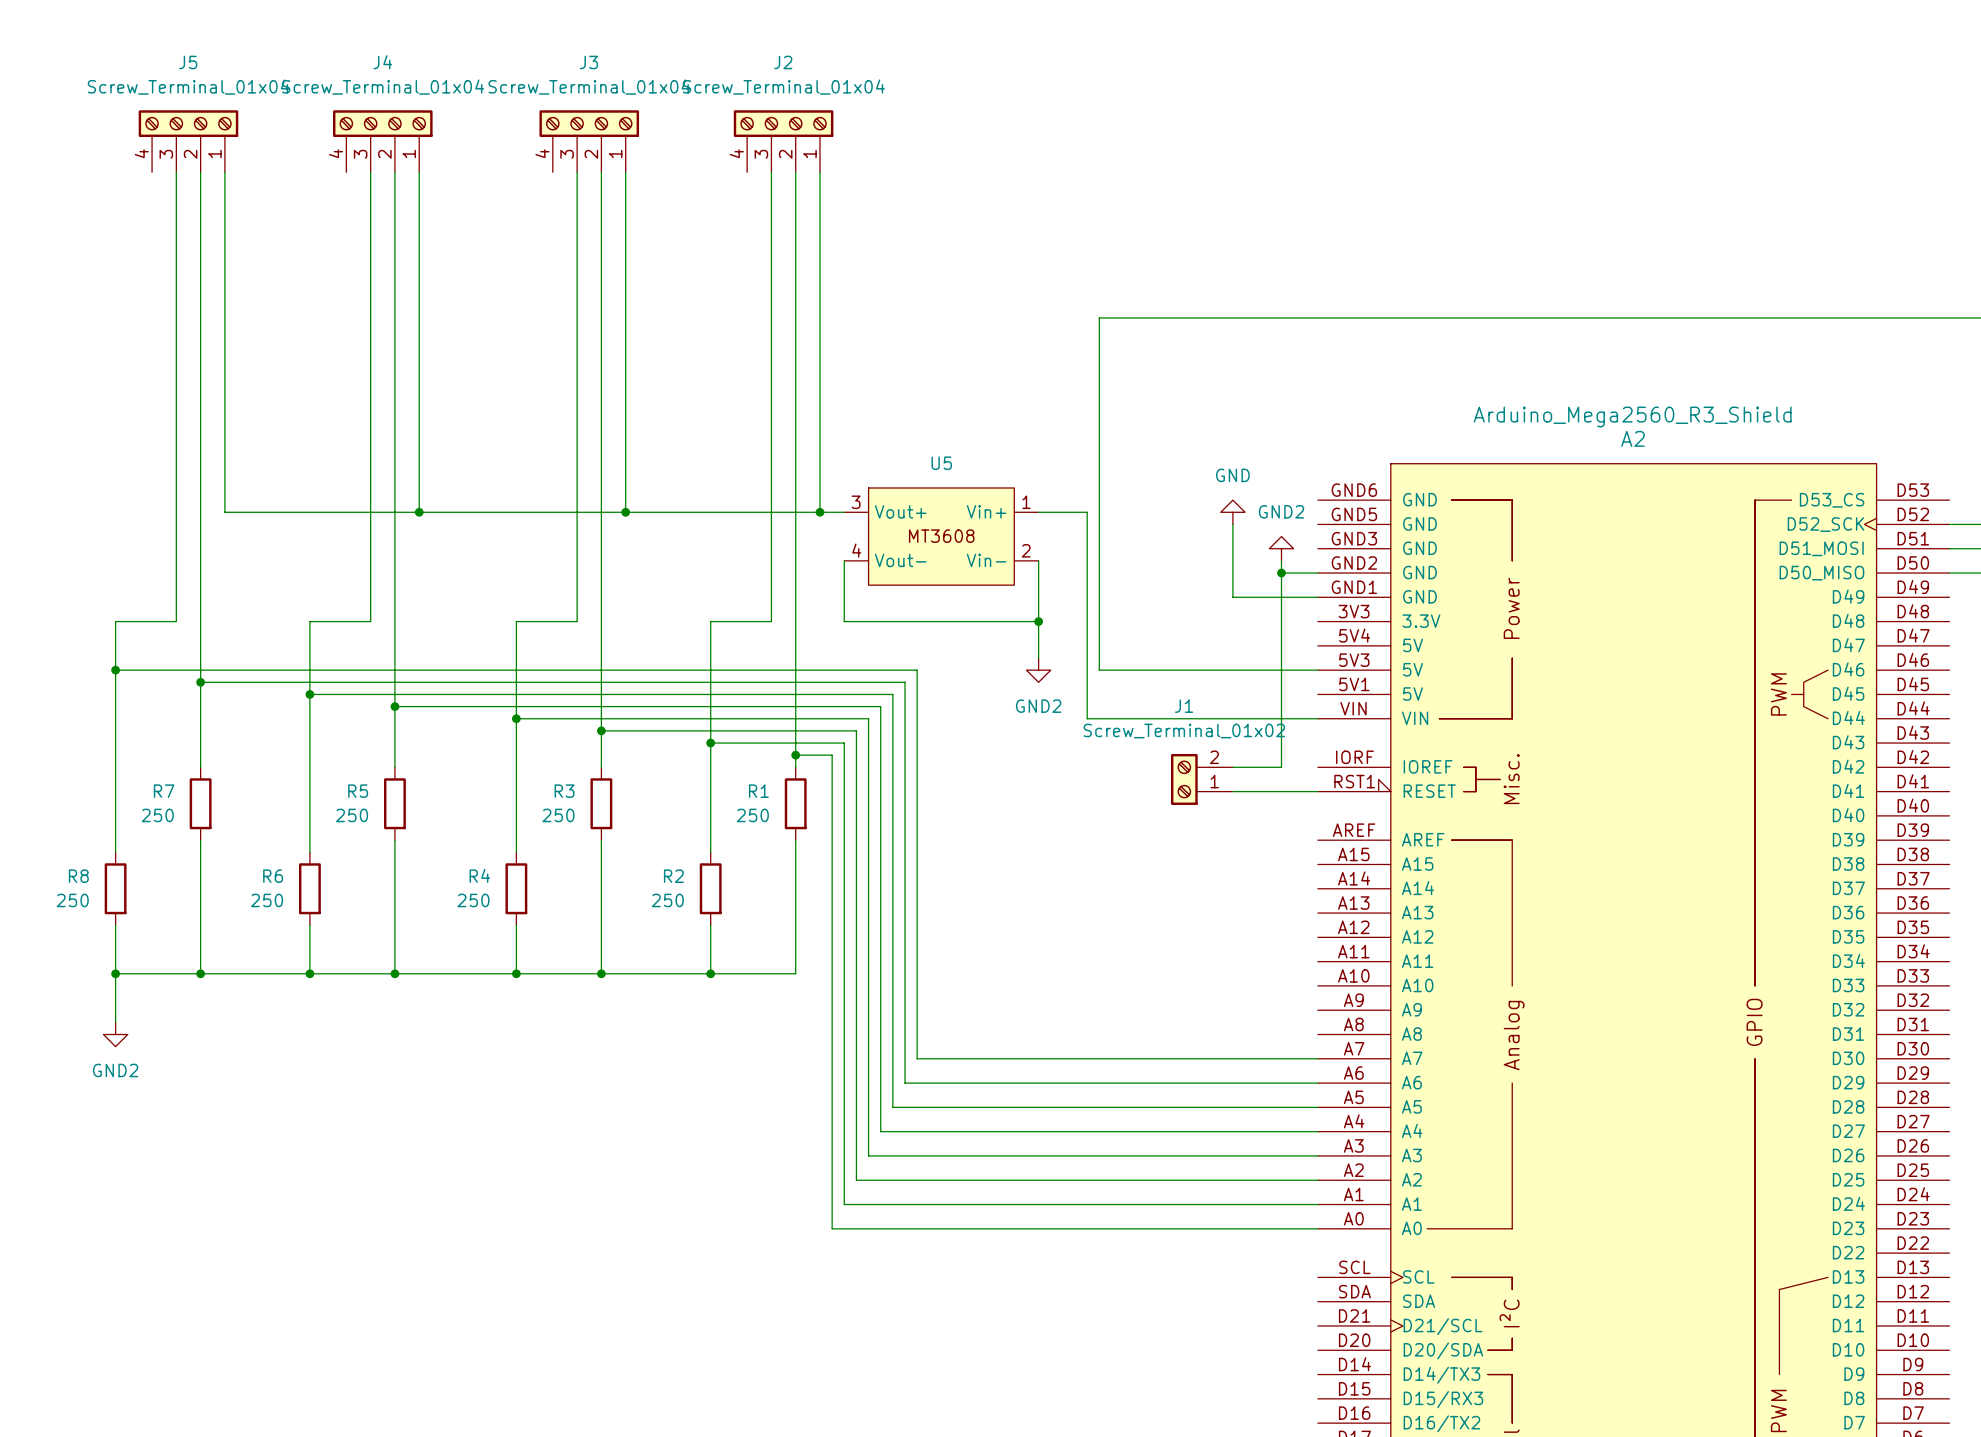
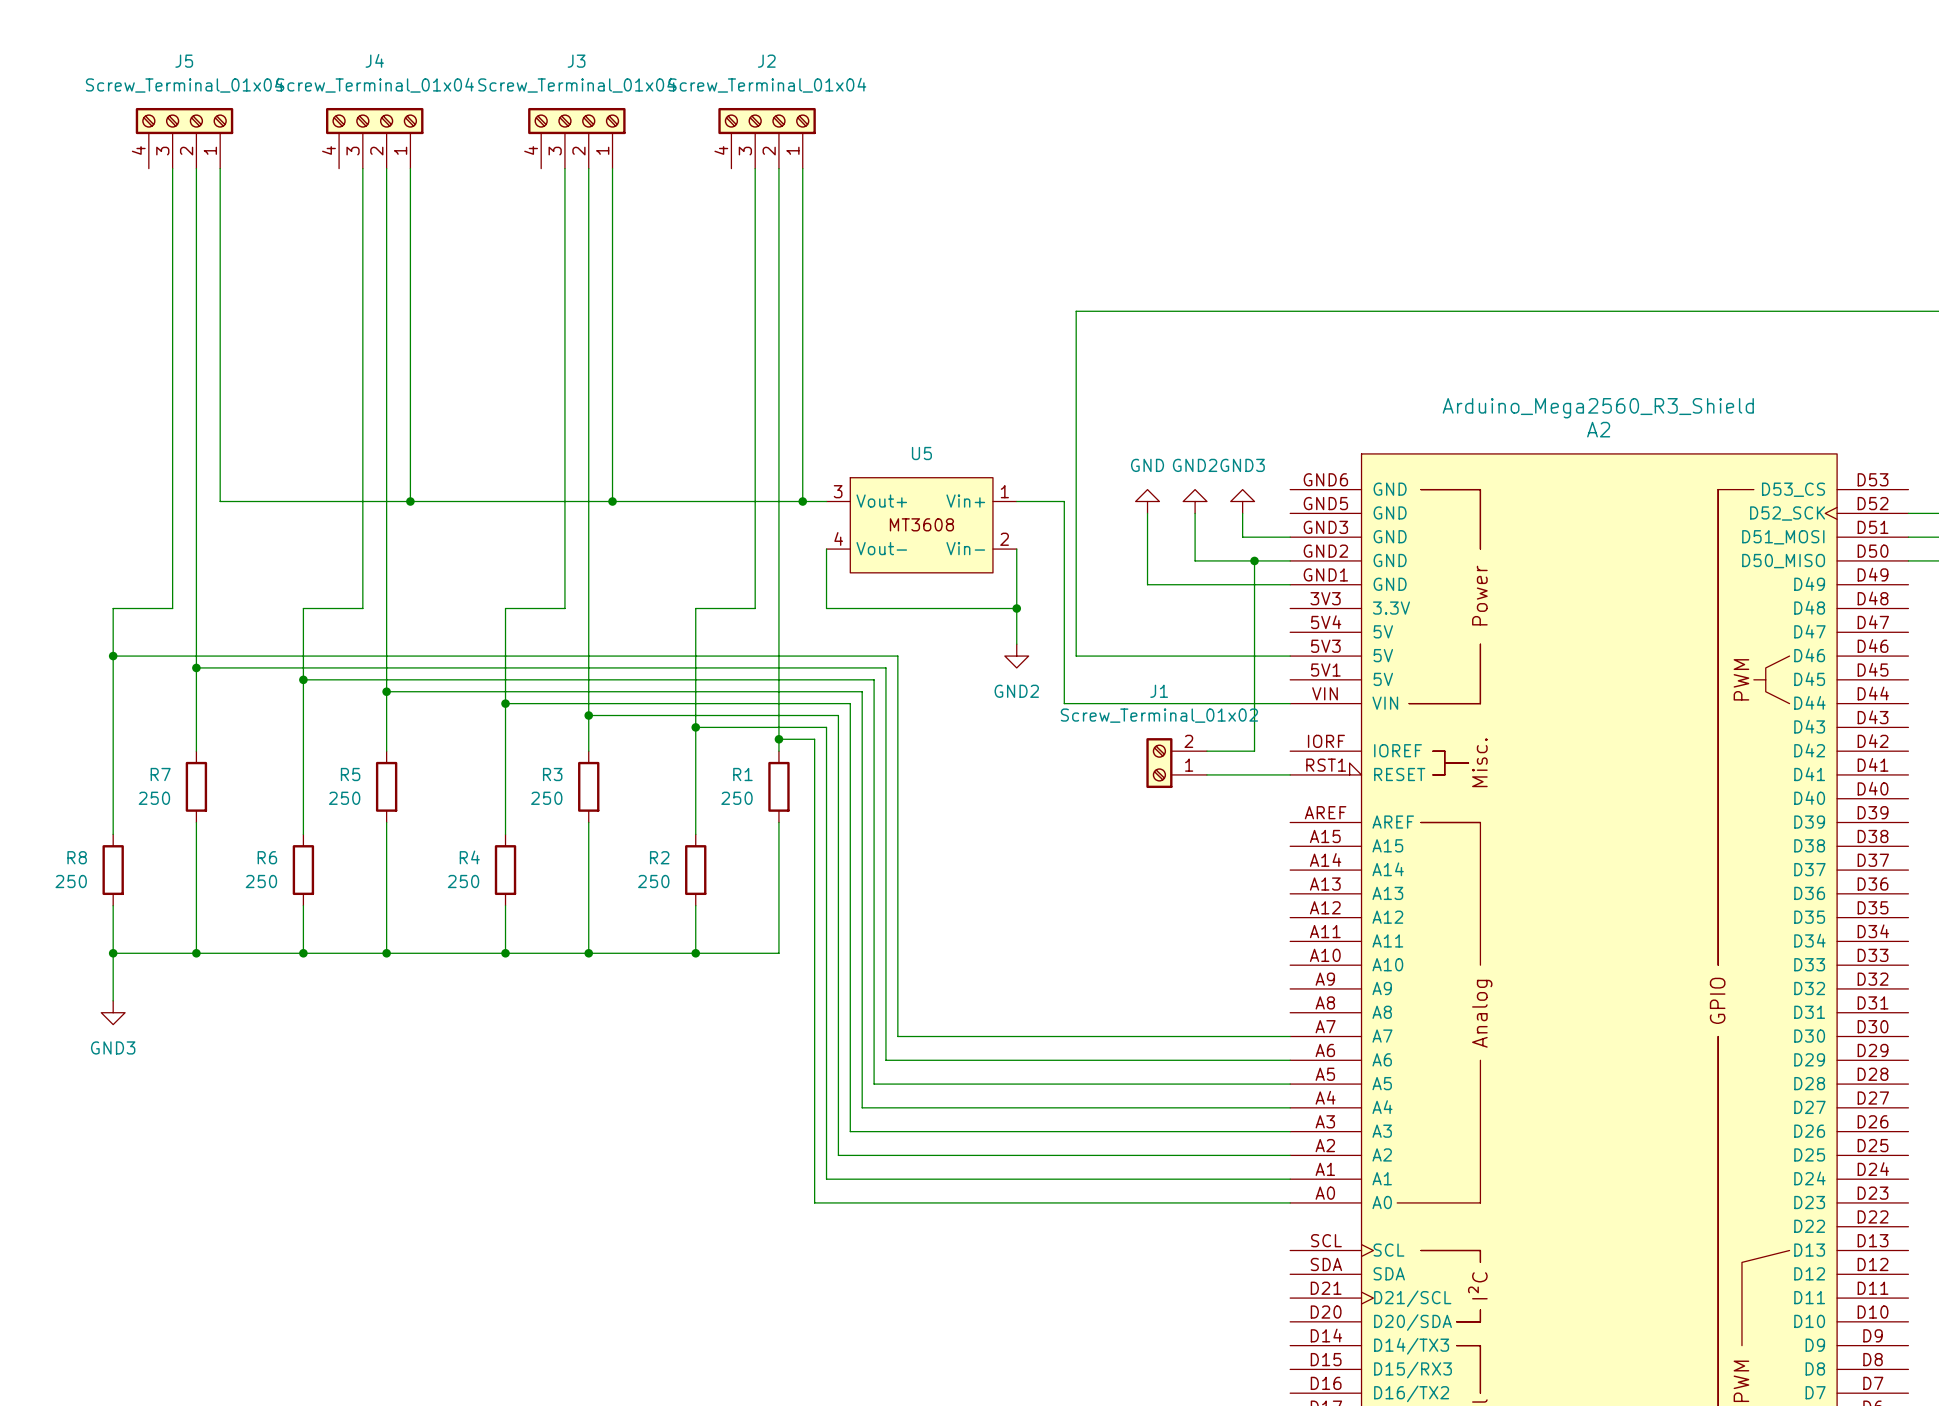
power symbol position: GND (1232, 512) -> GND (1147, 501)
power symbol: none -> GND3 (1242, 501)
wire: (1232, 524) (1232, 597) -> (1147, 513) (1147, 584) (1206, 584)
wire: none -> (1242, 513) (1242, 537) (1290, 537)
power symbol position: GND2 (1281, 548) -> GND2 (1195, 501)
wire: (1281, 560) (1281, 573) -> (1195, 513) (1195, 560) (1254, 560)
power symbol: GND2 (115, 1034) -> GND3 (113, 1012)

